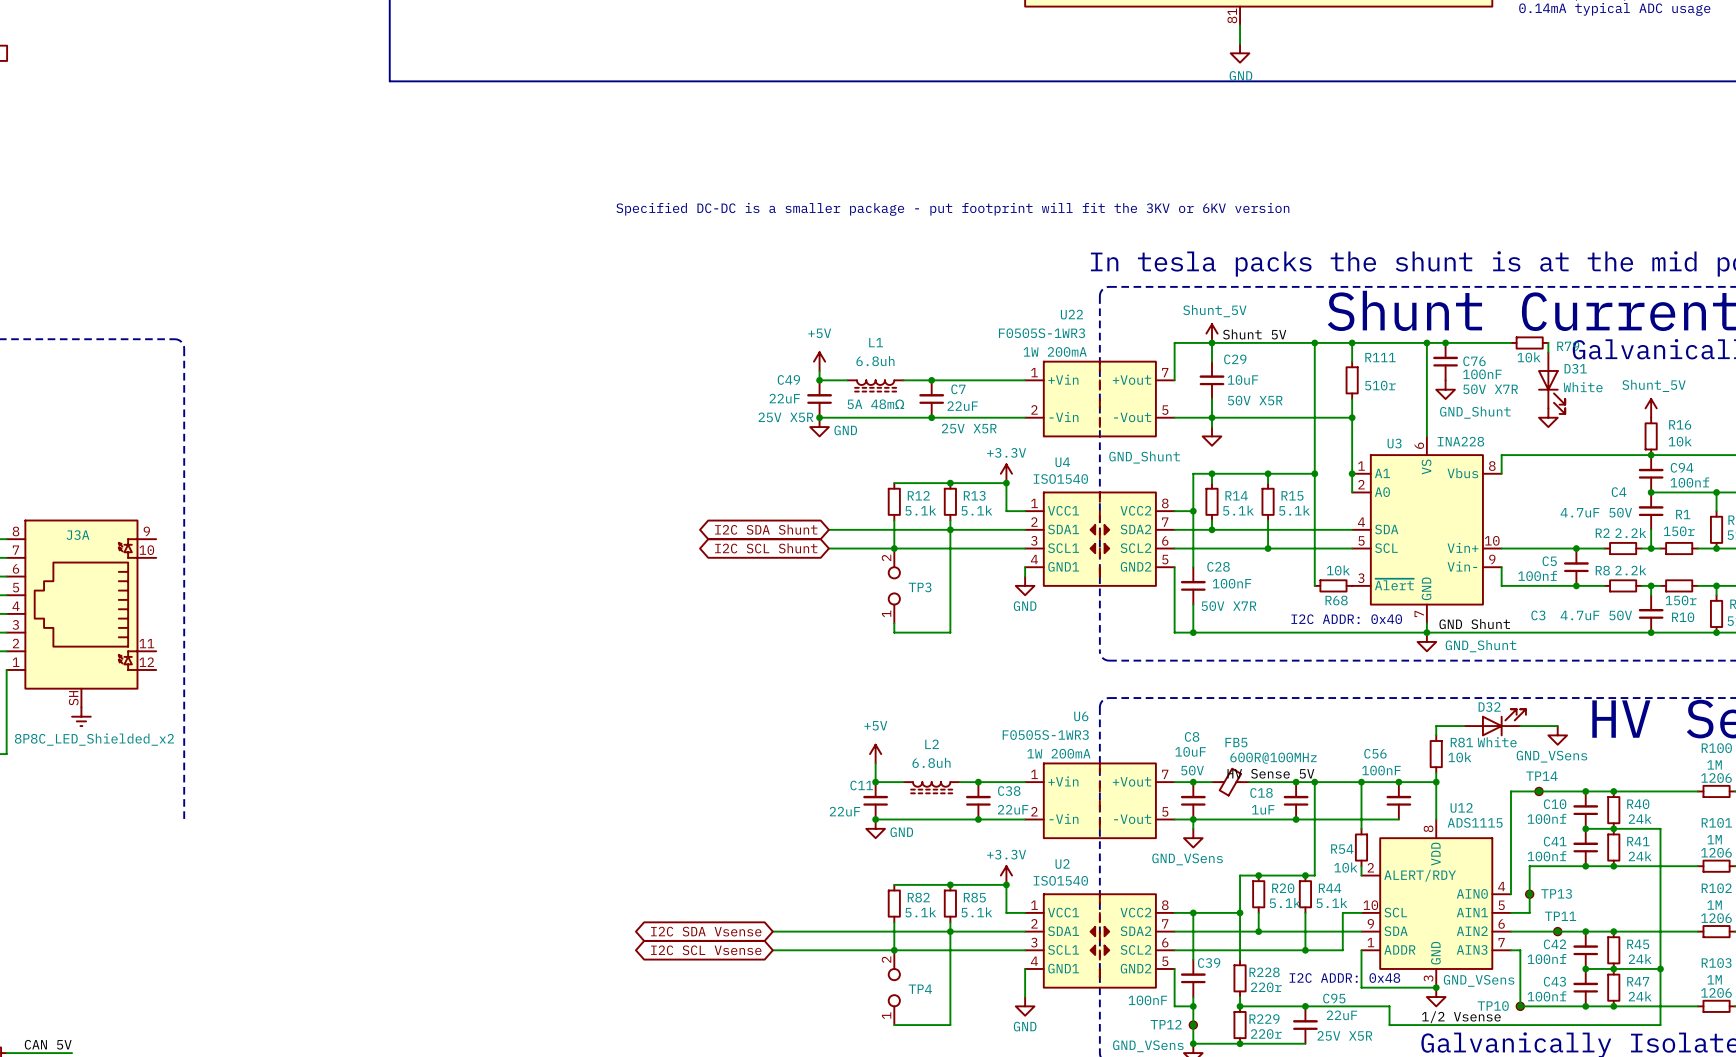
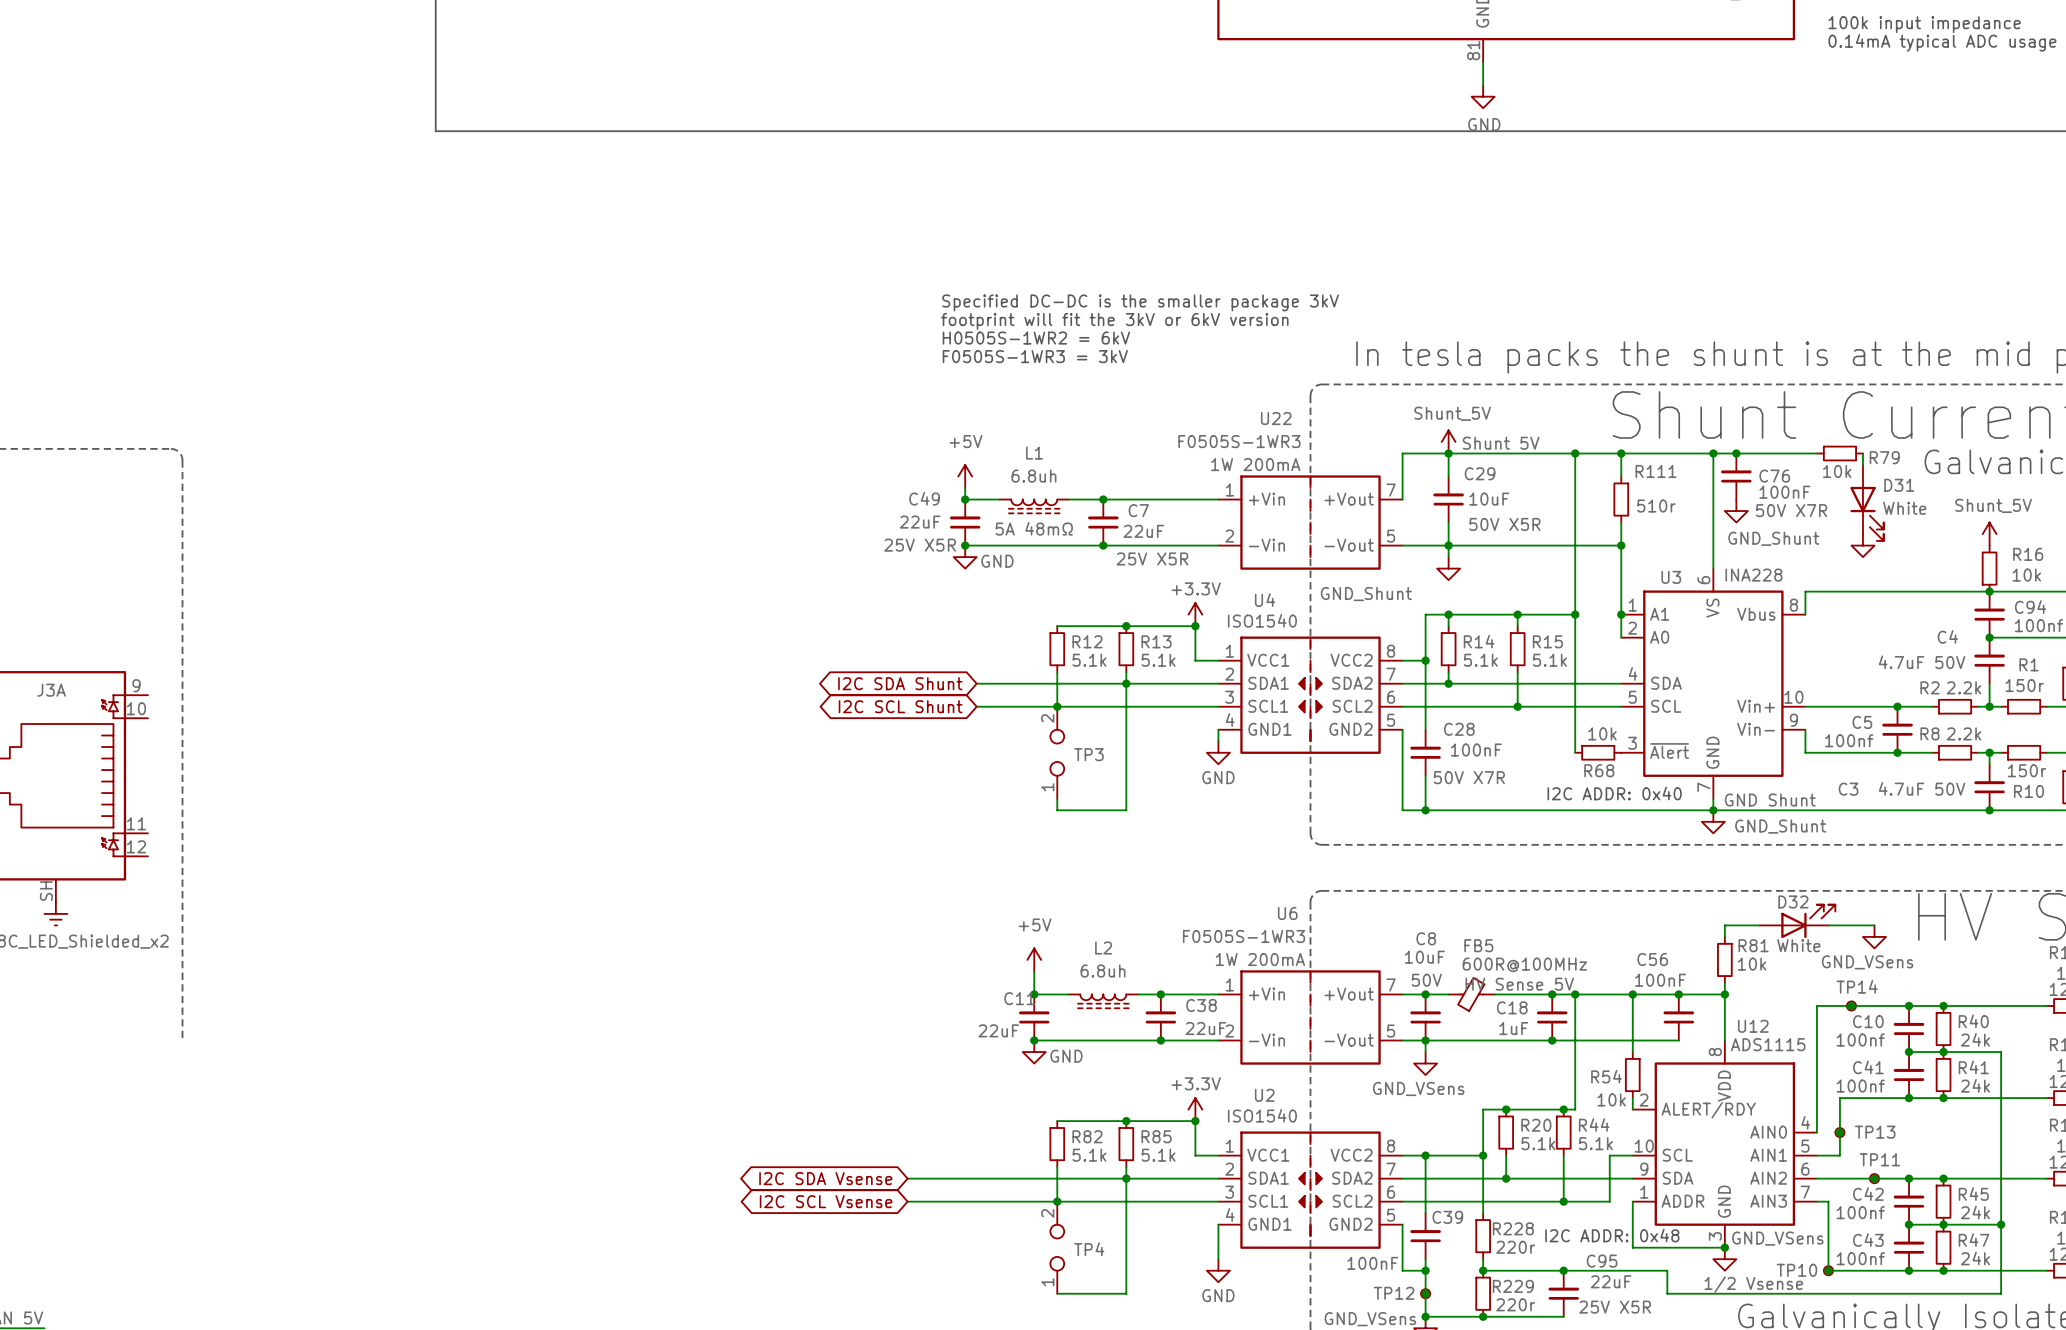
text: Specified DC-DC is a smaller package - put footprint will fit the 3KV or 6KV version (952, 209) -> Specified DC-DC is the smaller package 3kV (1140, 302)
text: none -> footprint will fit the 3kV or 6kV version (1114, 321)
text: none -> H0505S-1WR2 = 6kV (1036, 338)
text: none -> F0505S-1WR3 = 3kV (1035, 356)

